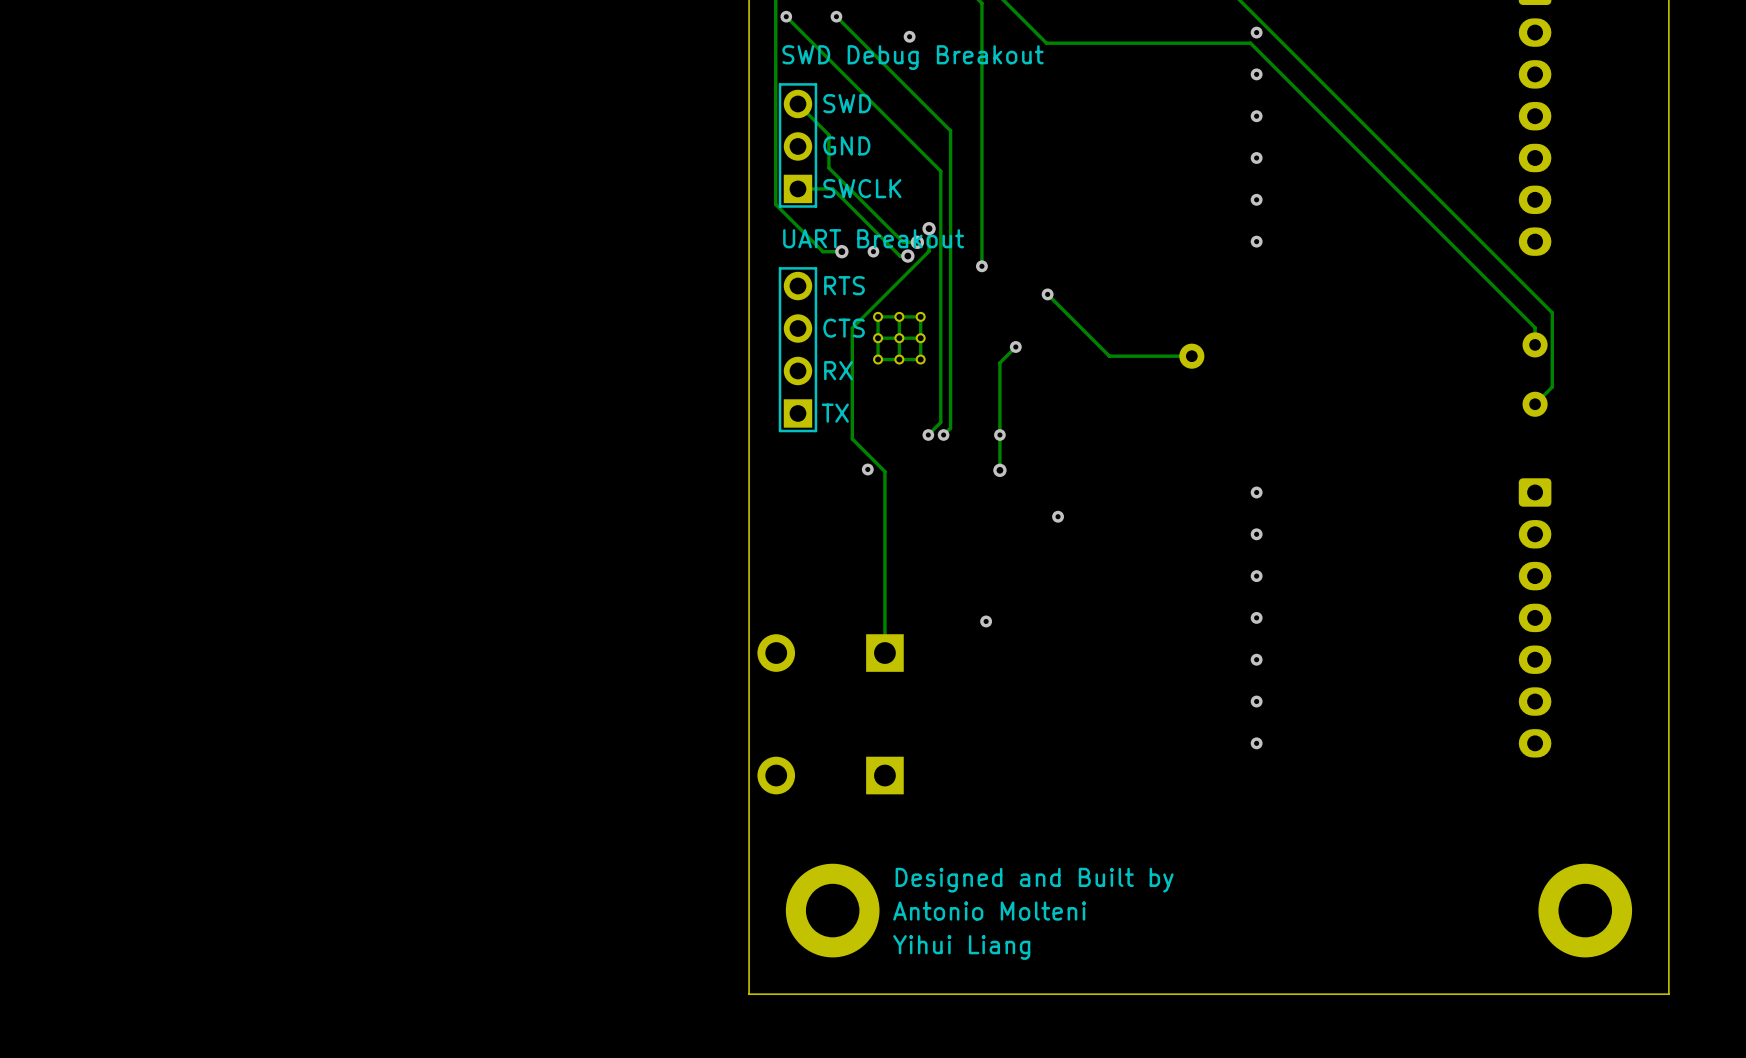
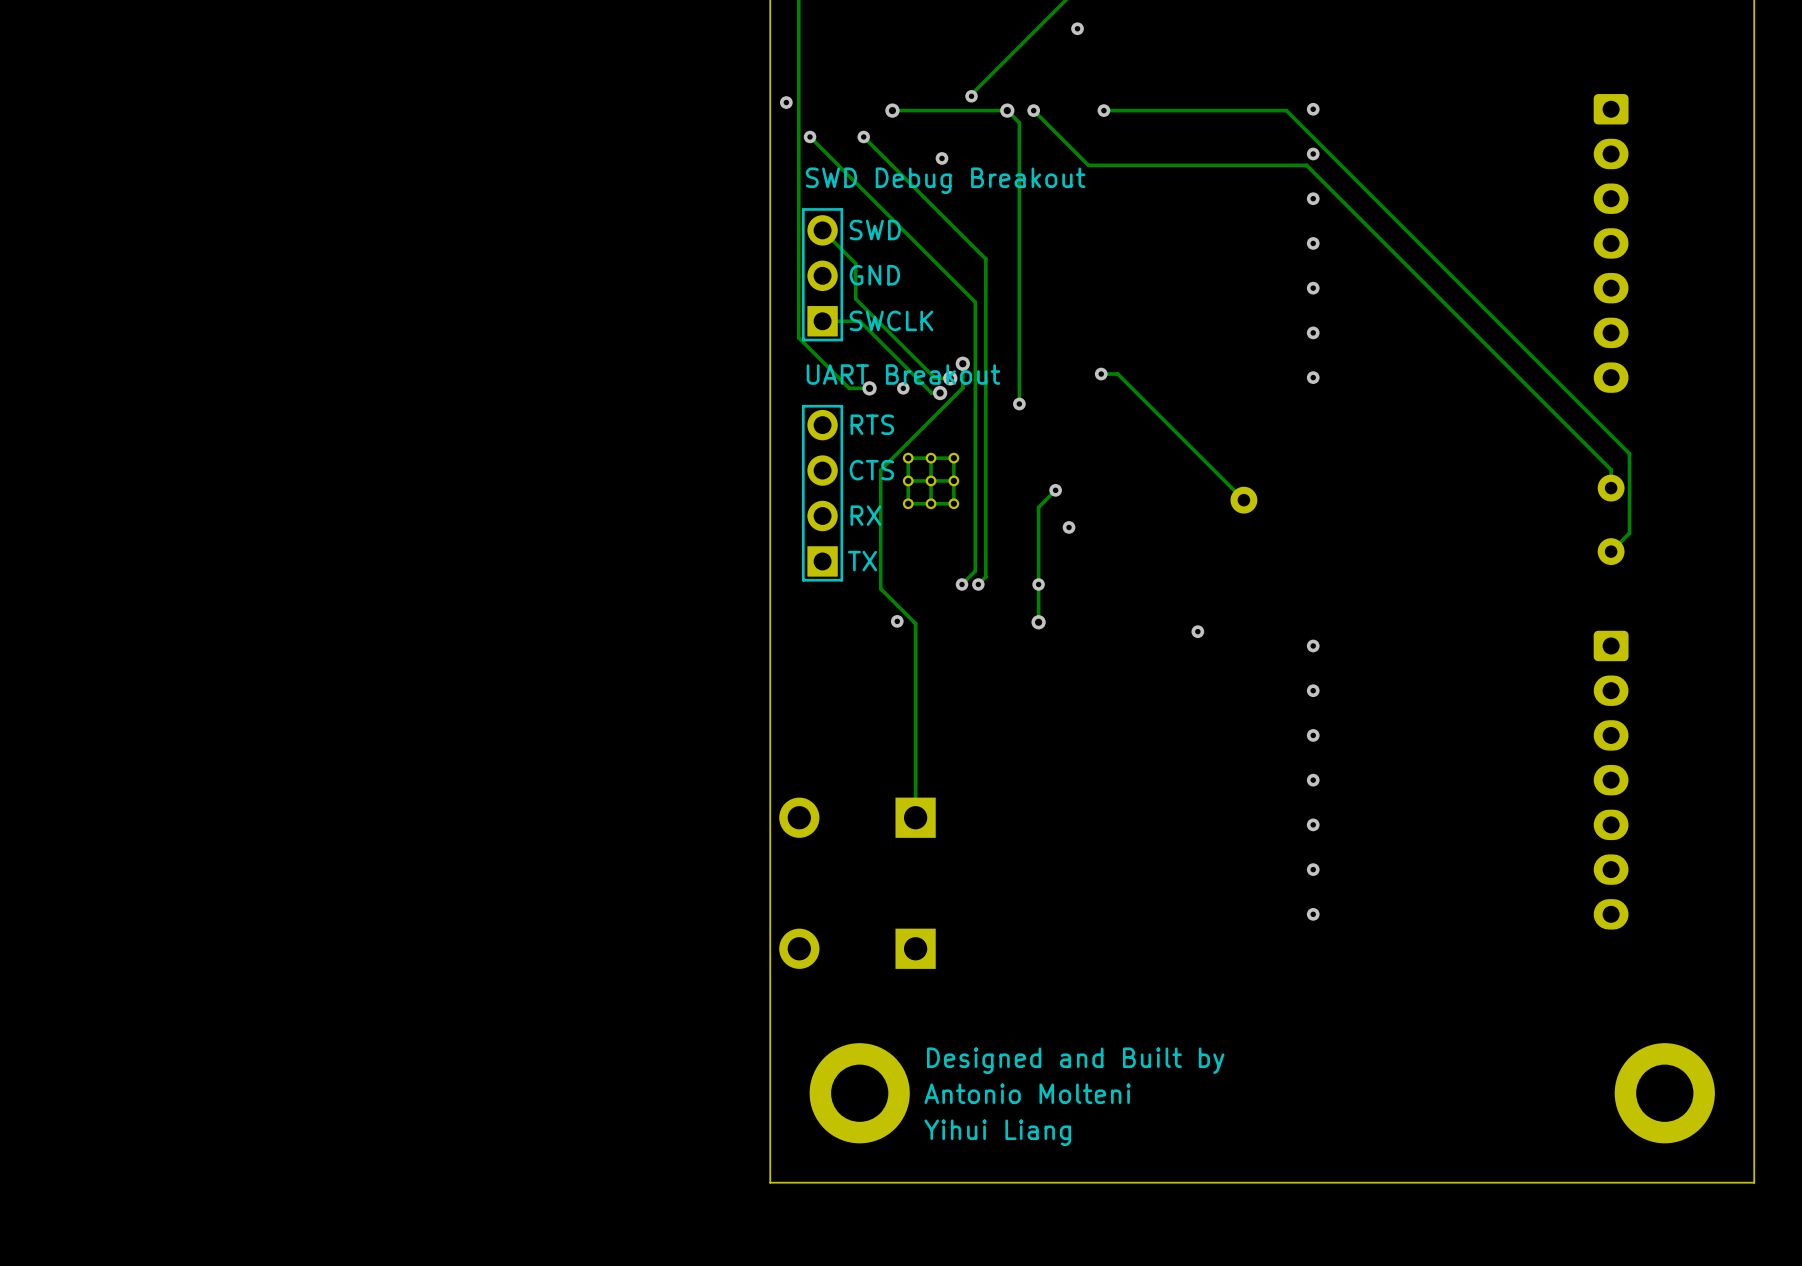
via: none -> (1101, 374)
track: (1047, 294) (1109, 356) (1191, 356) -> (1101, 374) (1117, 374) (1243, 500)
via: (1047, 294) -> none
via: none -> (1069, 527)
via: none -> (1197, 631)
via: (1058, 516) -> none
via: (986, 621) -> none

